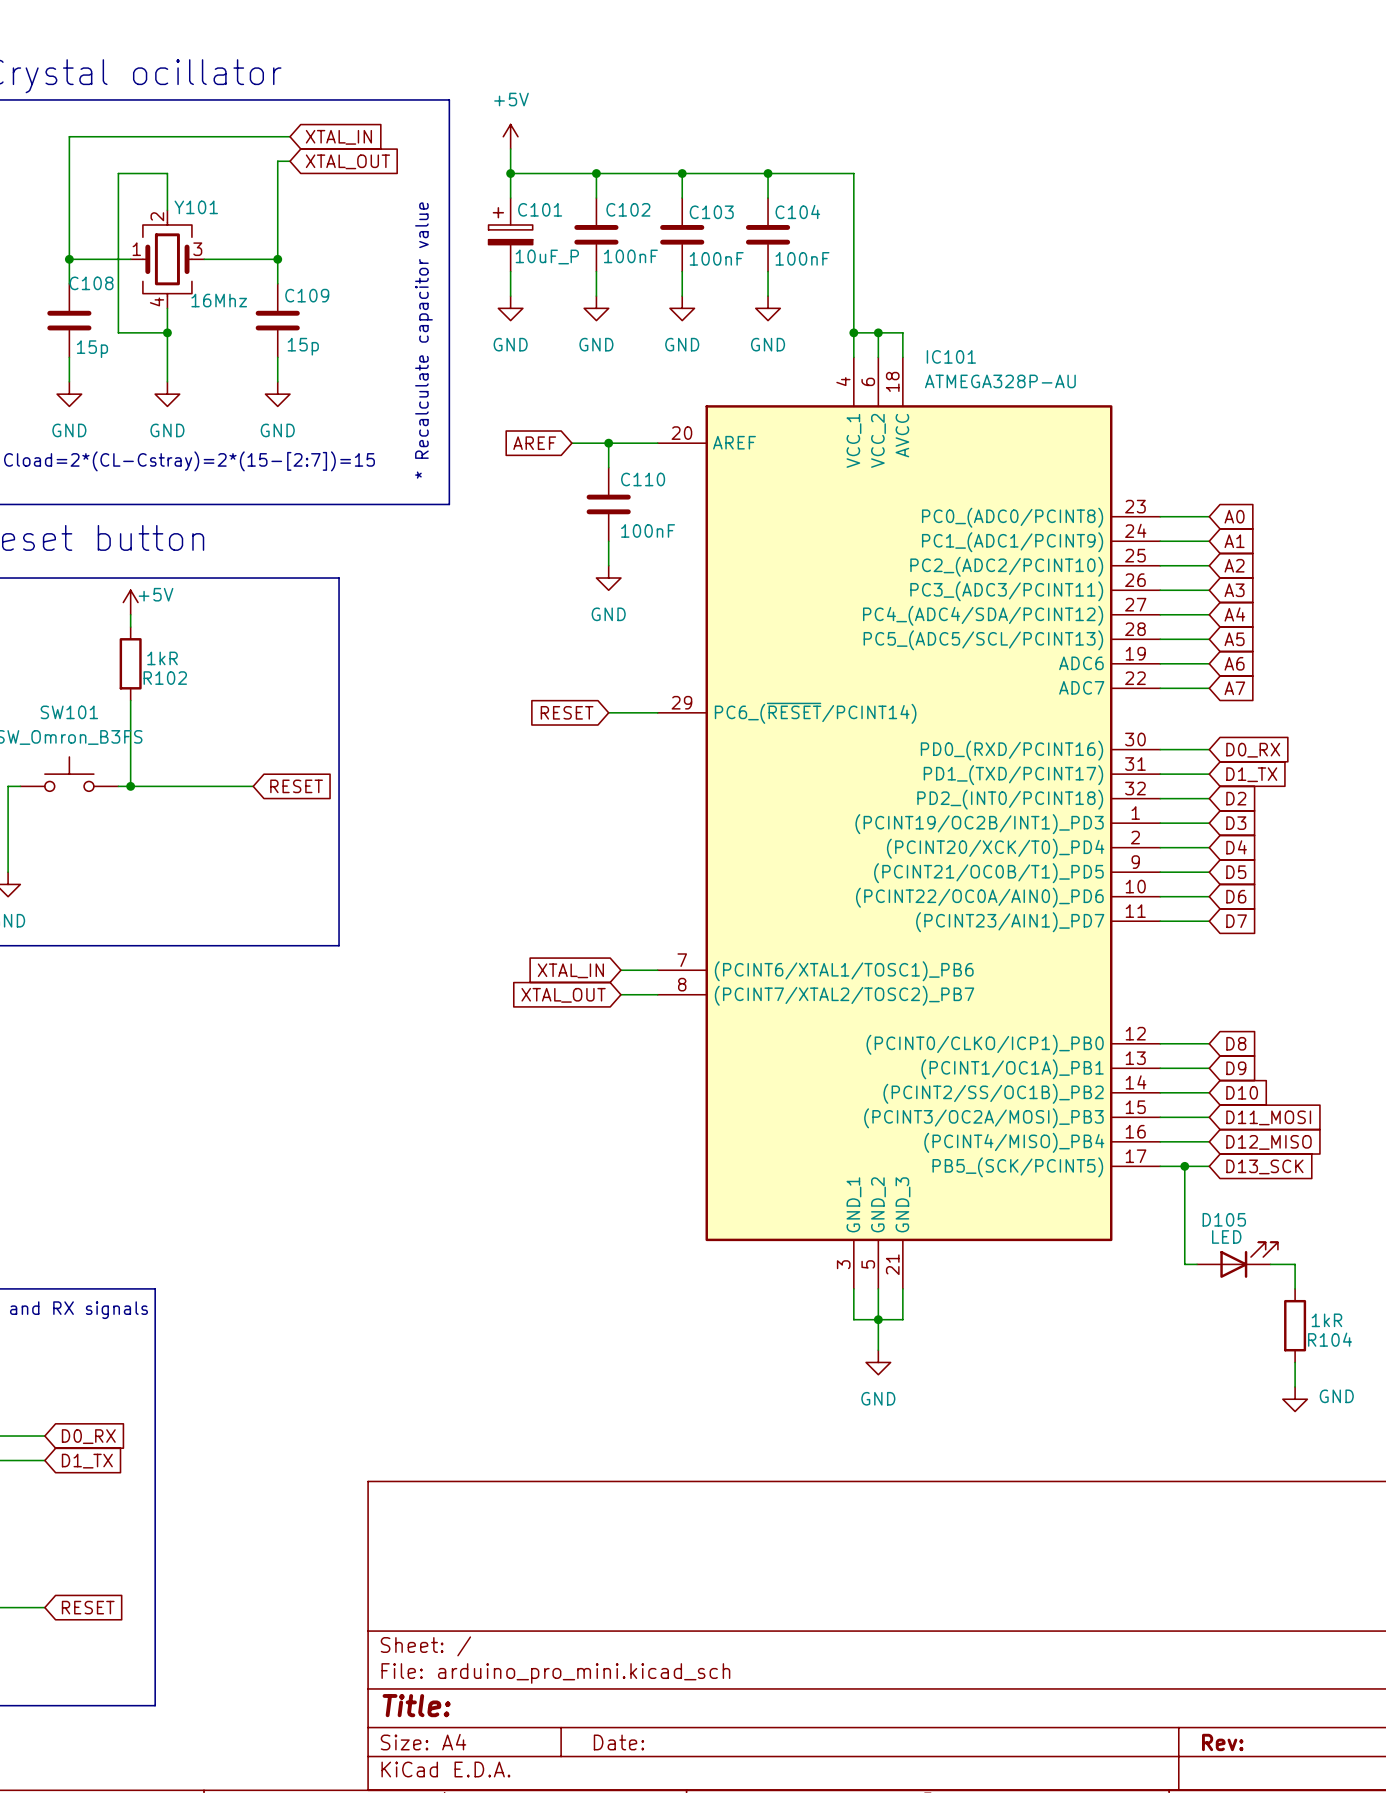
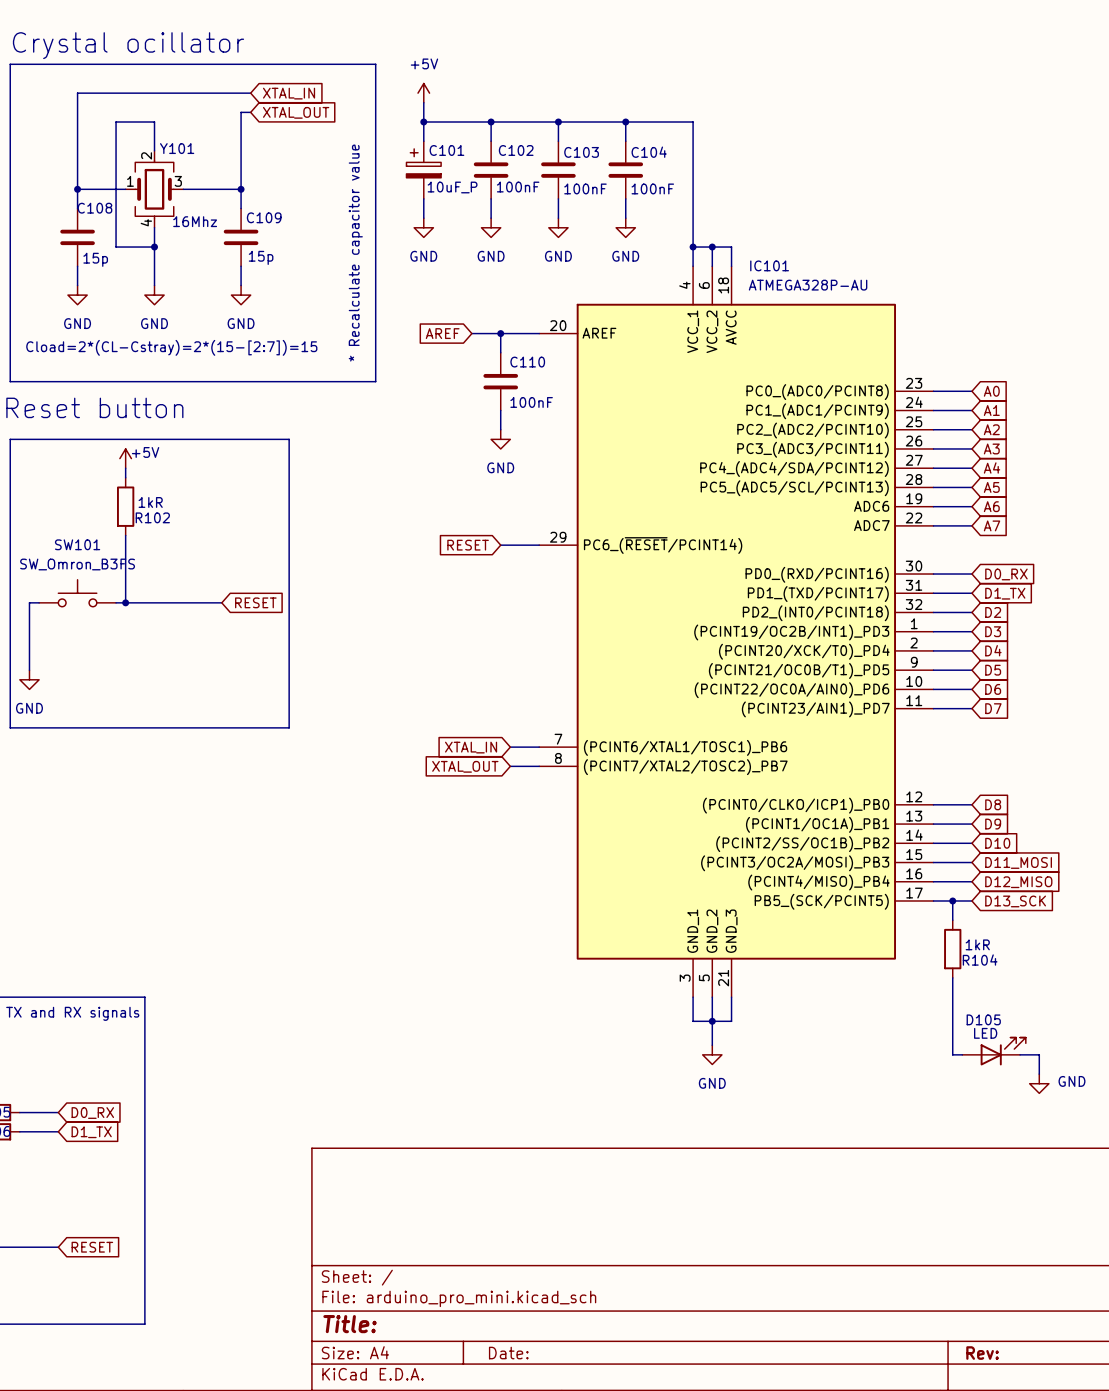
wire: (1184, 1190) (1184, 1264) (1197, 1264) -> none
D105 position: (1237, 1260) -> (994, 1051)
wire: none -> (952, 977) (952, 1054) (962, 1054)
wire: (1270, 1264) (1295, 1264) (1295, 1288) -> none
R104 position: (1295, 1325) -> (952, 949)
wire: none -> (1020, 1054) (1039, 1054)

